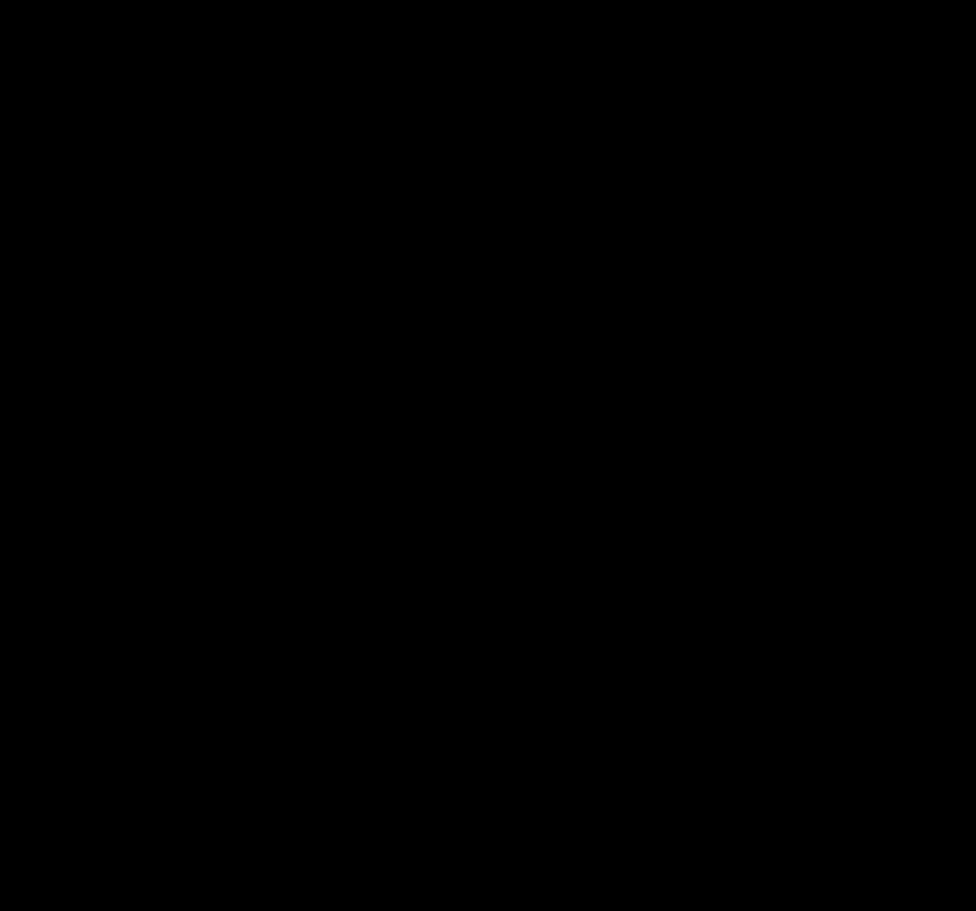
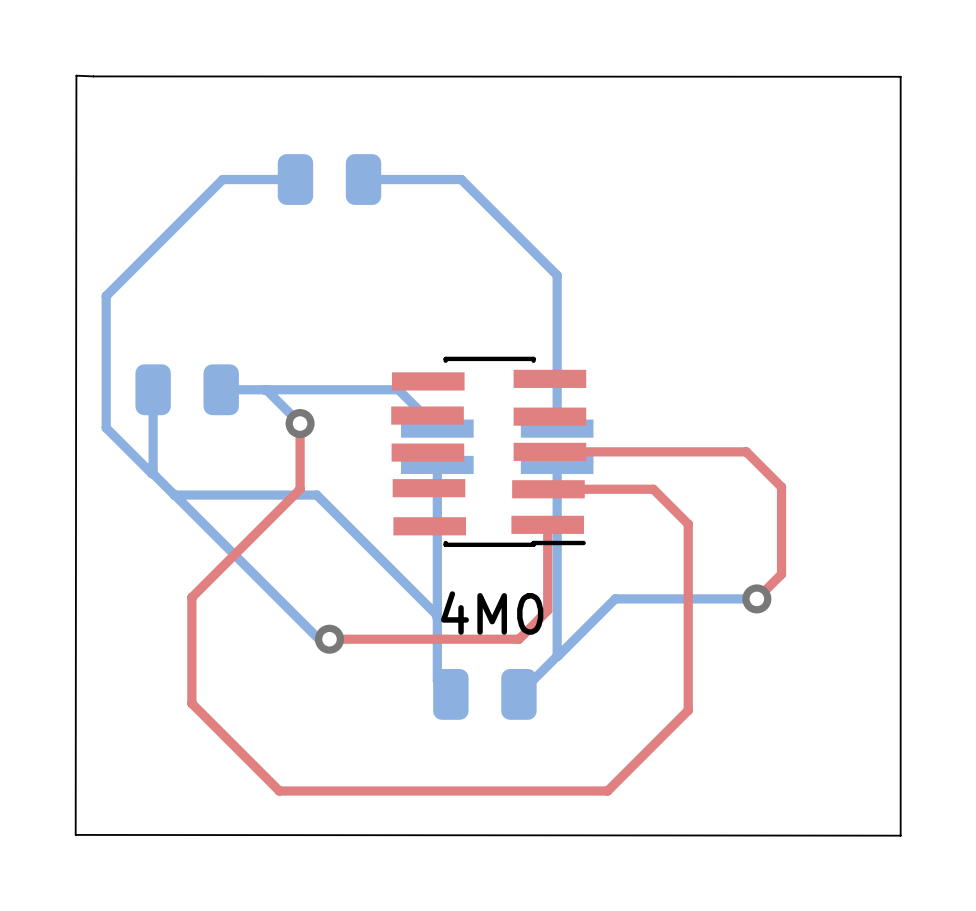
board edge: none -> (76, 75) (900, 76) (900, 835) (75, 834) (76, 75)
bottom track: none -> (295, 179) (222, 179) (106, 296) (106, 427) (153, 473)
part: none -> (329, 179)
bottom track: none -> (363, 179) (461, 179) (557, 275) (557, 428)
bottom track: none -> (153, 389) (153, 473)
part: none -> (187, 389)
bottom track: none -> (221, 389) (398, 389) (437, 428)
bottom track: none -> (266, 389) (300, 423)
top track: none -> (300, 423) (300, 489) (191, 597) (191, 703) (279, 791) (607, 791) (688, 710) (688, 524) (653, 489) (548, 489)
via: none -> (300, 423)
part: none -> (497, 446)
4M0: none -> (488, 451)
top track: none -> (549, 451) (746, 451) (781, 487) (781, 574) (756, 598)
bottom track: none -> (437, 464) (437, 680) (450, 694)
bottom track: none -> (557, 464) (557, 656)
bottom track: none -> (153, 473) (174, 495) (316, 495) (437, 615)
bottom track: none -> (174, 495) (318, 639) (329, 639)
top track: none -> (547, 524) (547, 610) (519, 639) (329, 639)
bottom track: none -> (756, 598) (615, 598) (557, 656)
via: none -> (756, 598)
via: none -> (329, 639)
bottom track: none -> (557, 656) (518, 694)
part: none -> (484, 694)

